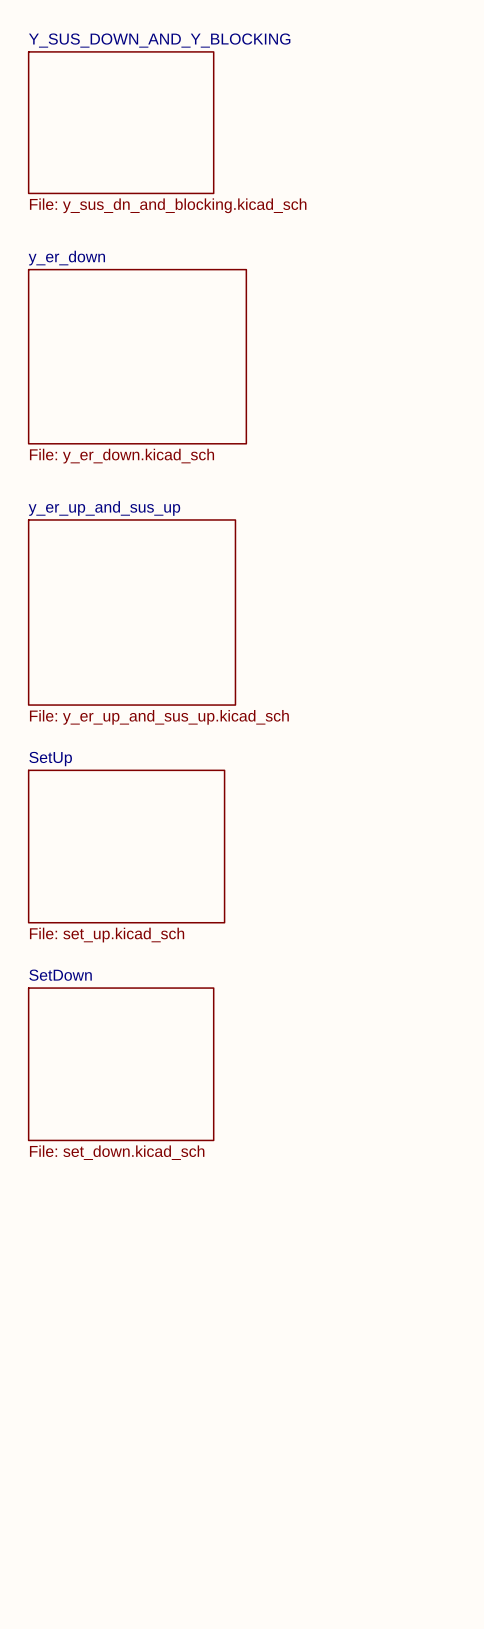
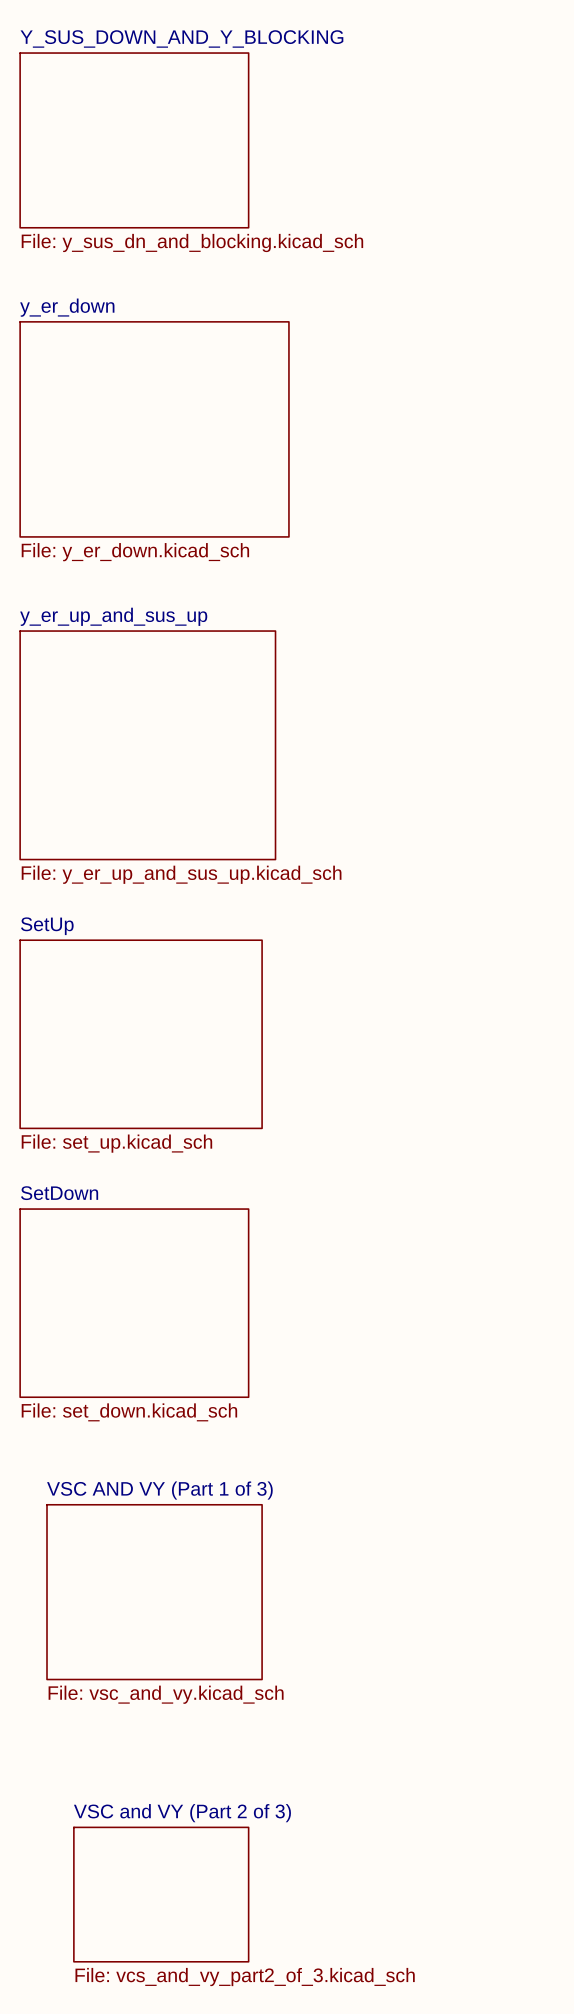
sheet VSC AND VY (Part 1 of 3): none -> File: vsc_and_vy.kicad_sch (154, 1592)
sheet VSC and VY (Part 2 of 3): none -> File: vcs_and_vy_part2_of_3.kicad_sch (161, 1894)

